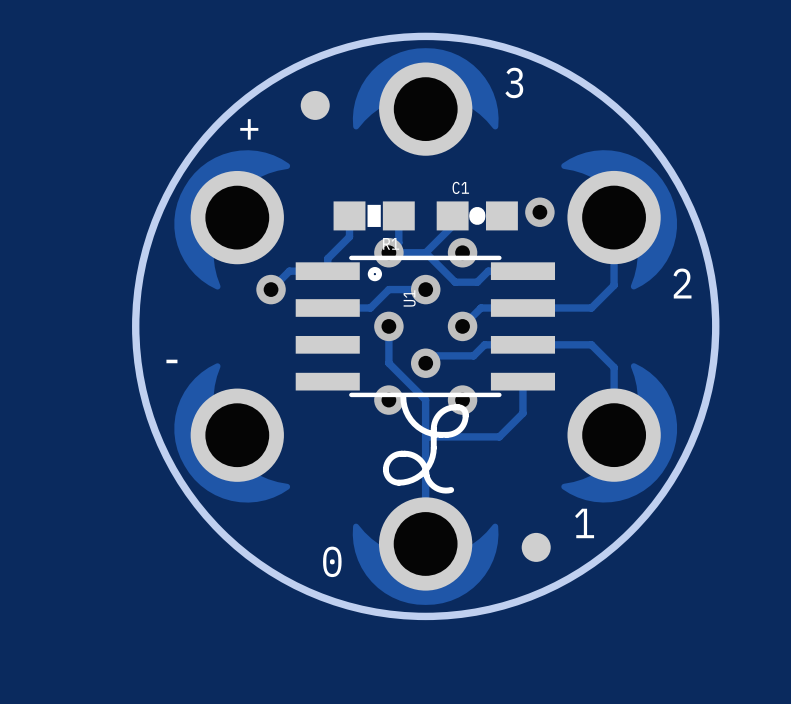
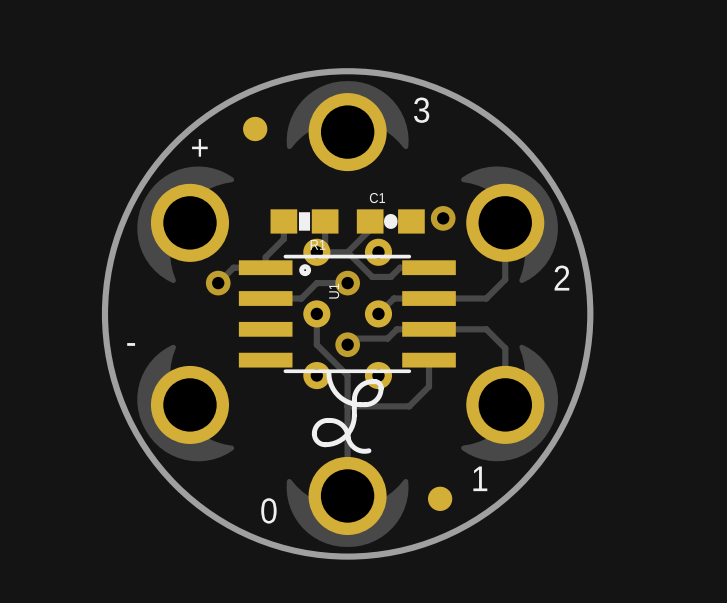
via: (388, 252) -> none
via: (462, 252) -> none
via: (388, 326) -> none
part: none -> (347, 313)
via: (462, 326) -> none
via: (388, 400) -> none
via: (462, 400) -> none

